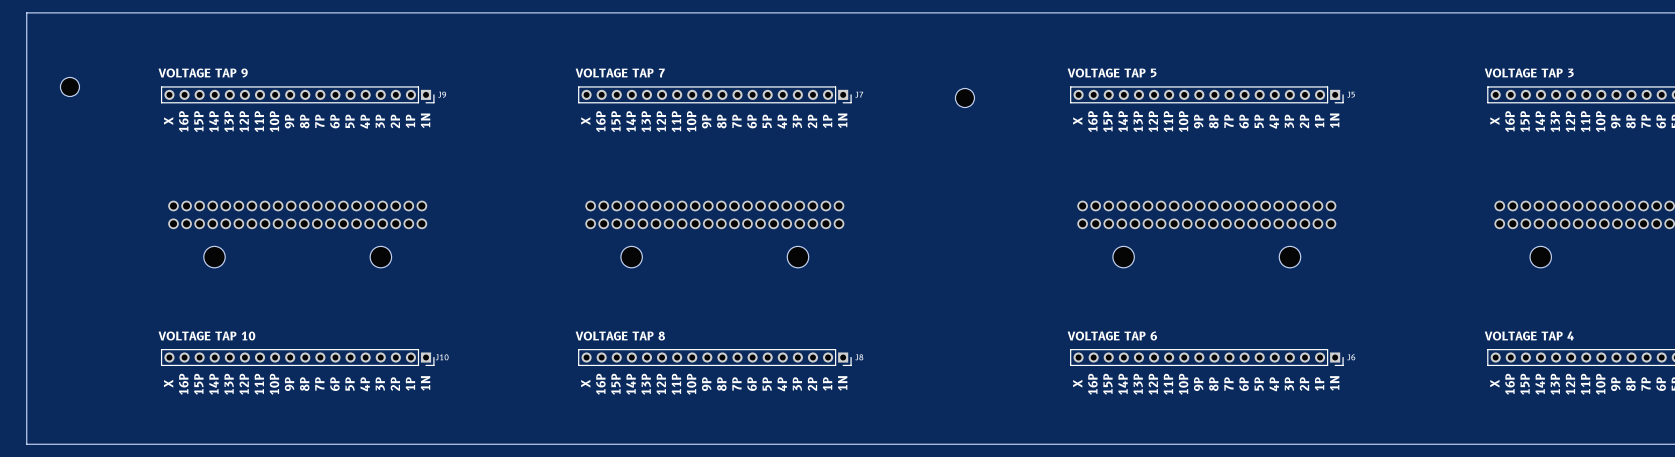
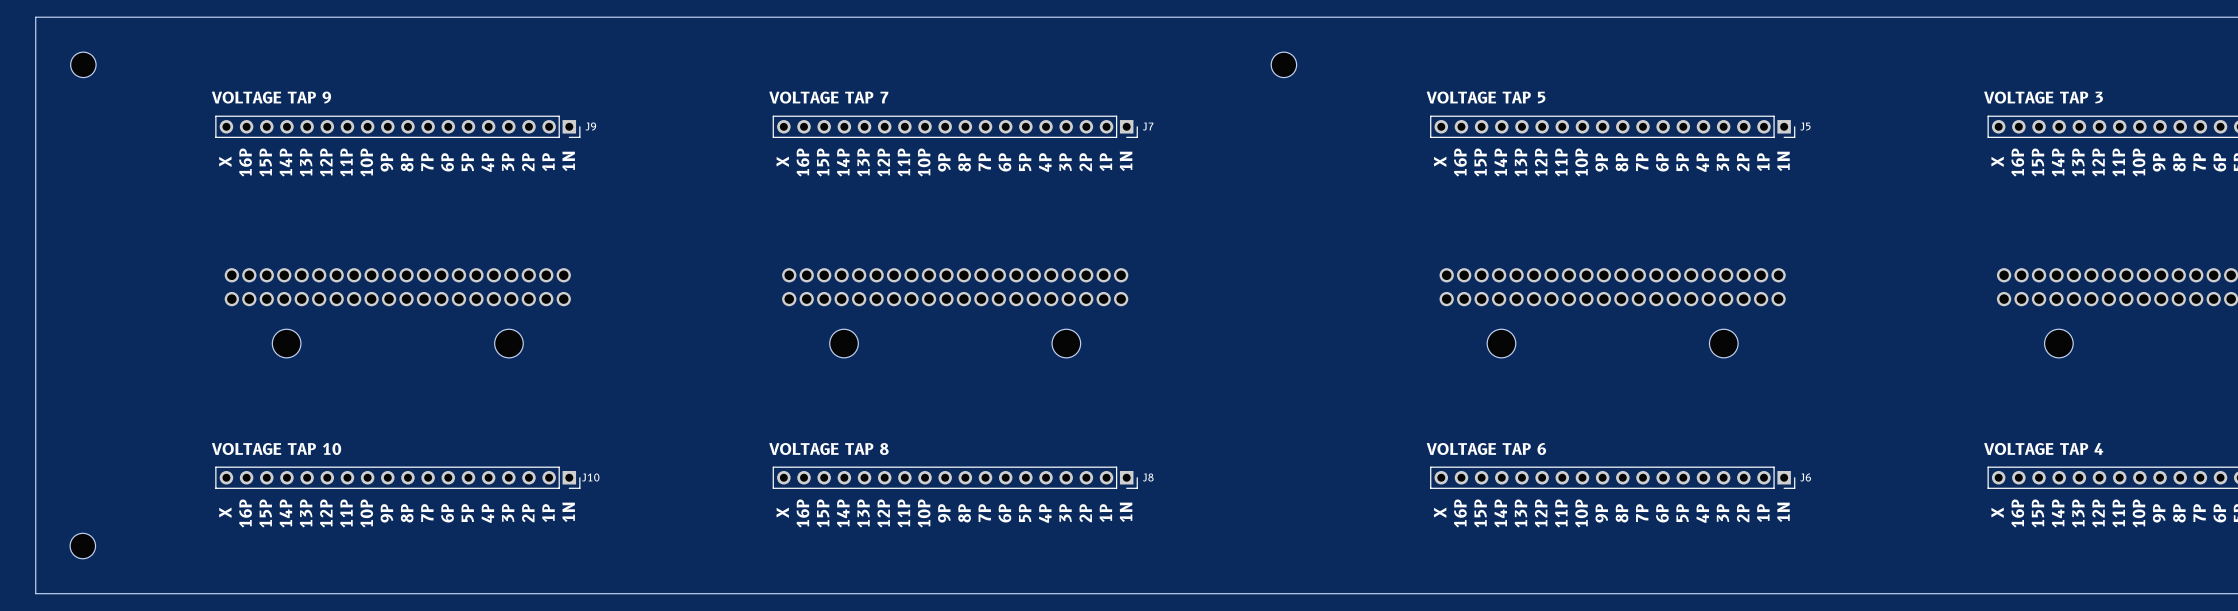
part position: (69, 86) -> (83, 64)
part position: (964, 98) -> (1283, 64)
part: none -> (82, 546)

